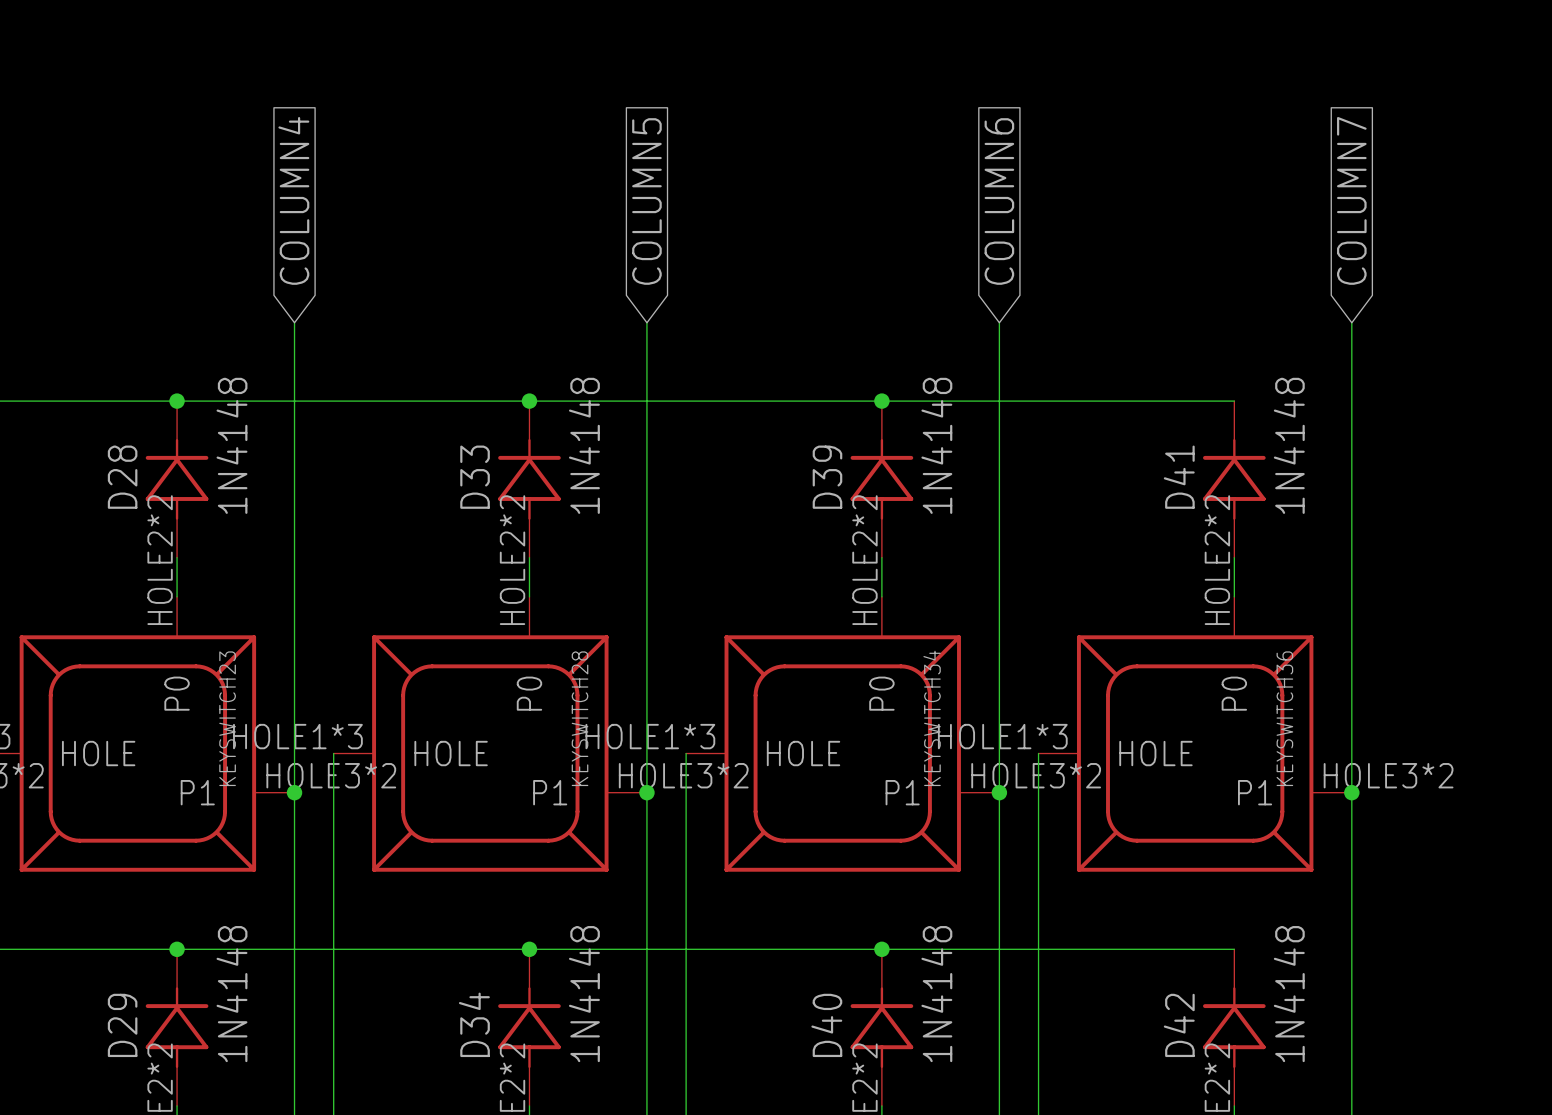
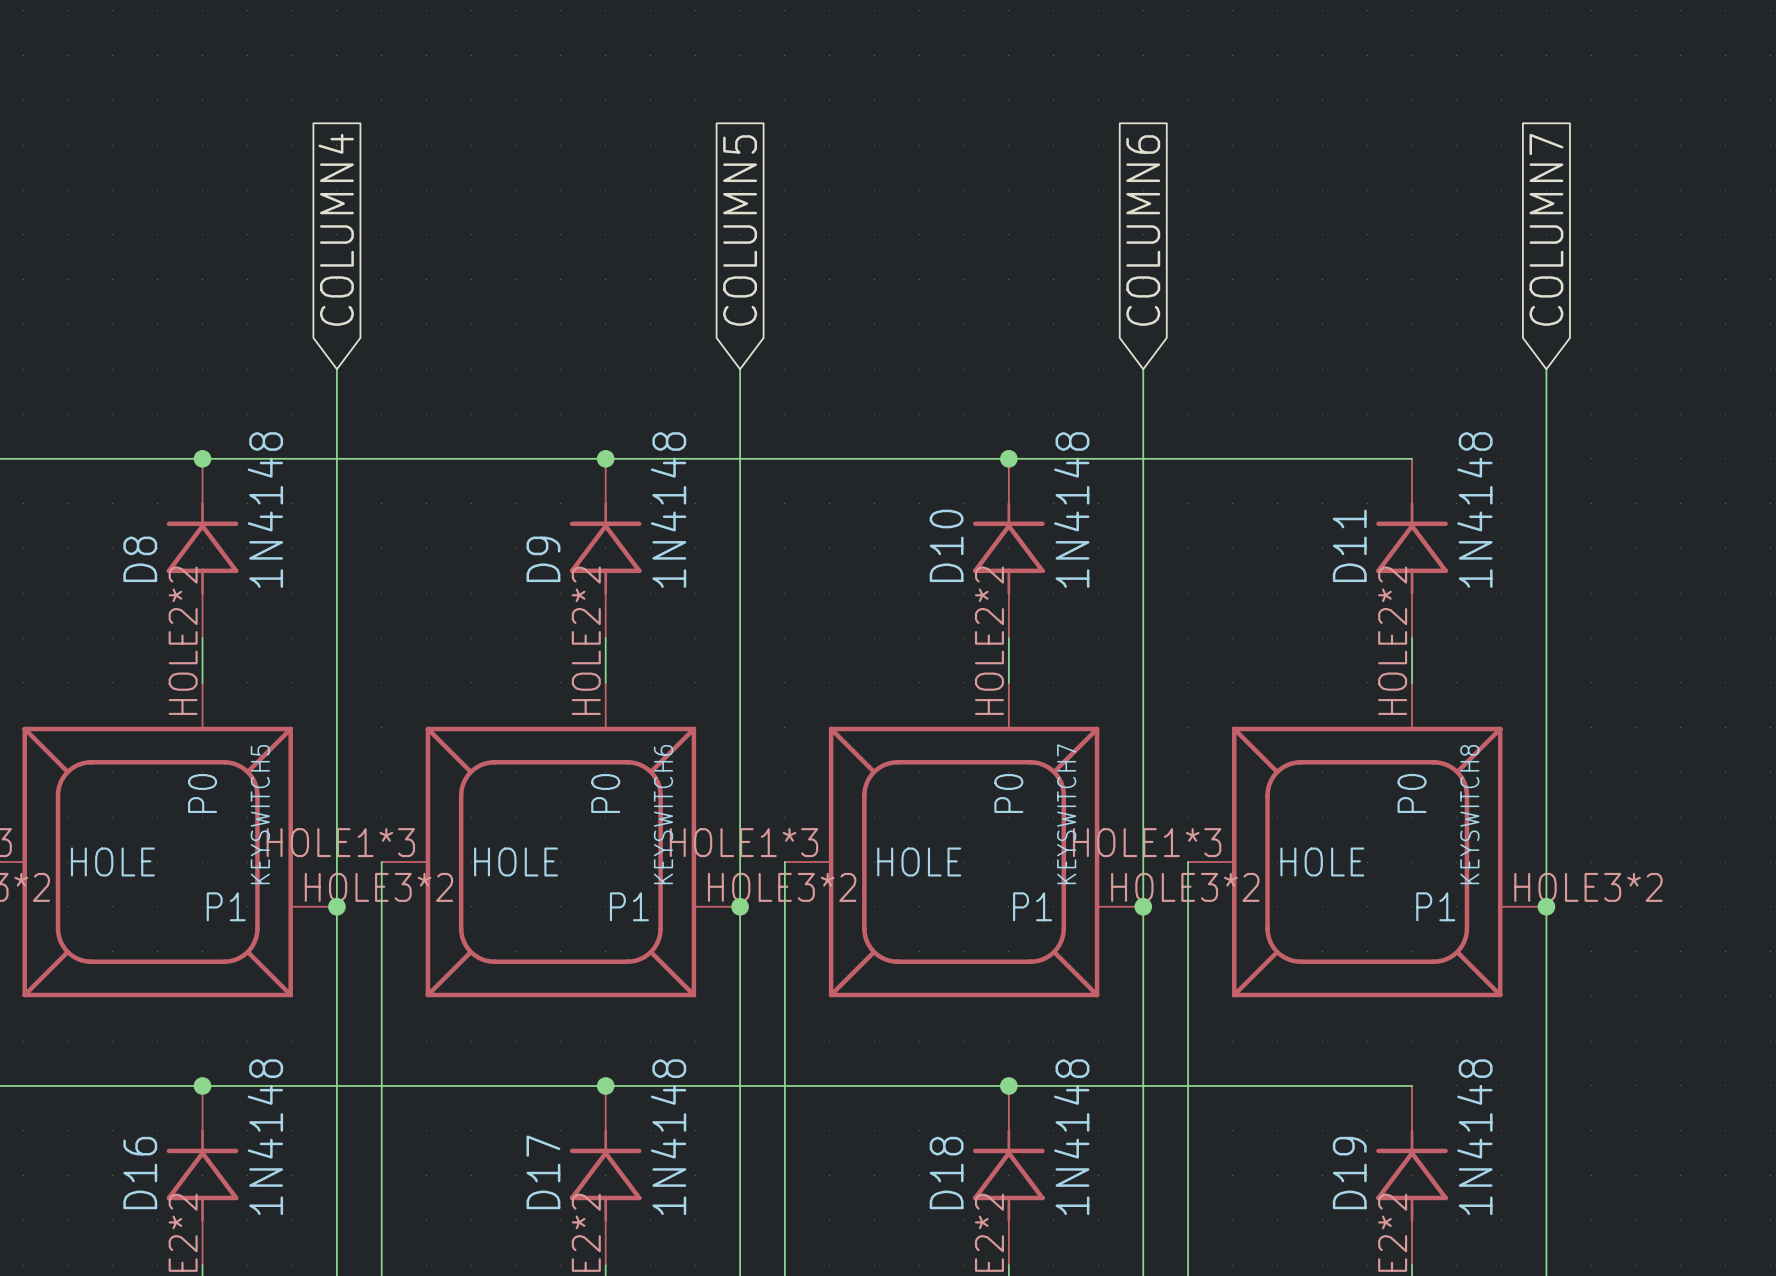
D28 name: D28 (122, 477) -> D8 (140, 559)
D33 name: D33 (475, 477) -> D9 (543, 559)
D39 name: D39 (827, 477) -> D10 (946, 545)
D41 name: D41 (1179, 477) -> D11 (1349, 545)
KEYSWITCH23 name: KEYSWITCH23 (227, 718) -> KEYSWITCH5 (260, 814)
KEYSWITCH28 name: KEYSWITCH28 (580, 718) -> KEYSWITCH6 (663, 814)
KEYSWITCH34 name: KEYSWITCH34 (932, 718) -> KEYSWITCH7 (1066, 814)
KEYSWITCH36 name: KEYSWITCH36 (1284, 718) -> KEYSWITCH8 (1469, 814)
D34 name: D34 (474, 1024) -> D17 (543, 1172)
D29 name: D29 (122, 1025) -> D16 (140, 1173)
D40 name: D40 (826, 1025) -> D18 (946, 1173)
D42 name: D42 (1179, 1025) -> D19 (1349, 1173)

